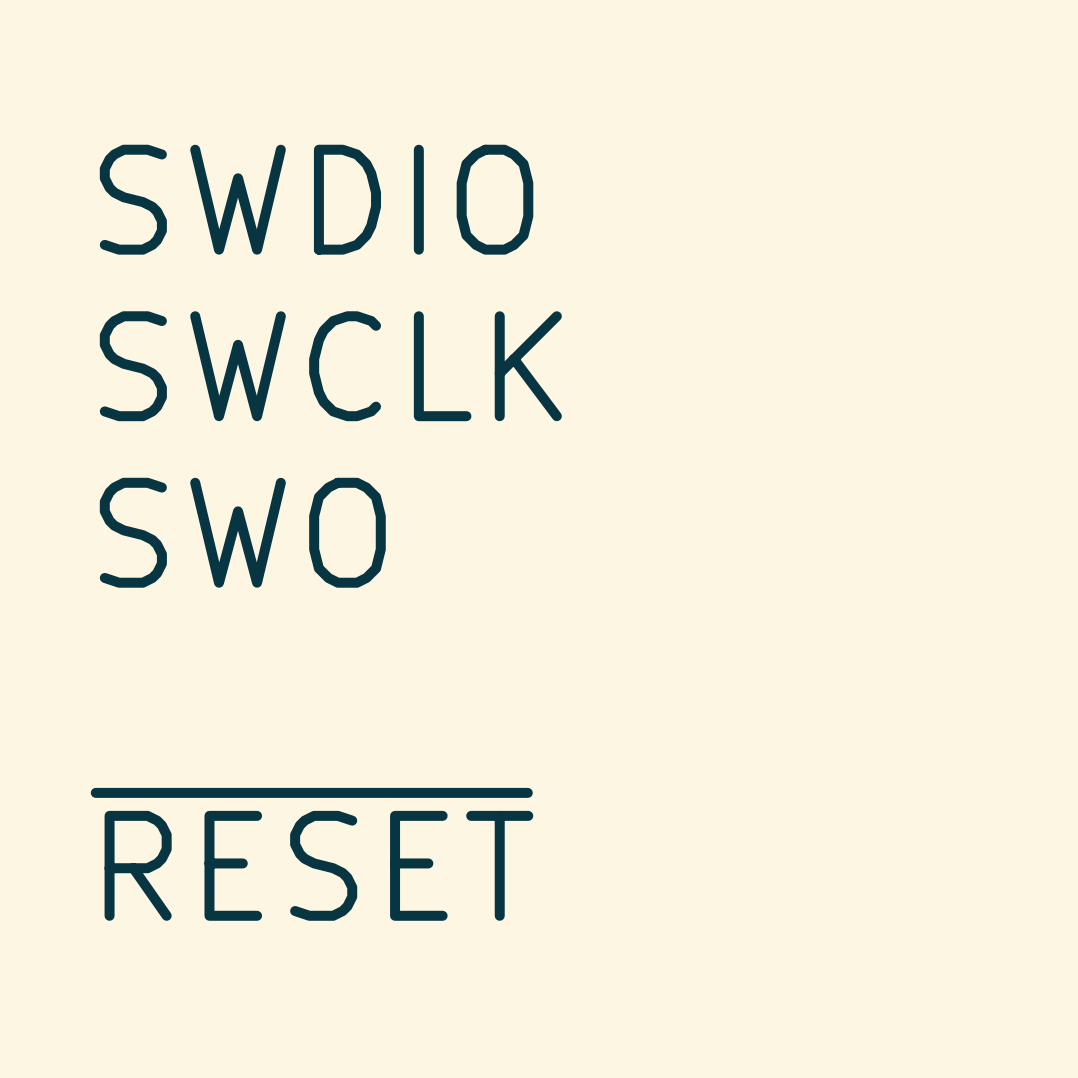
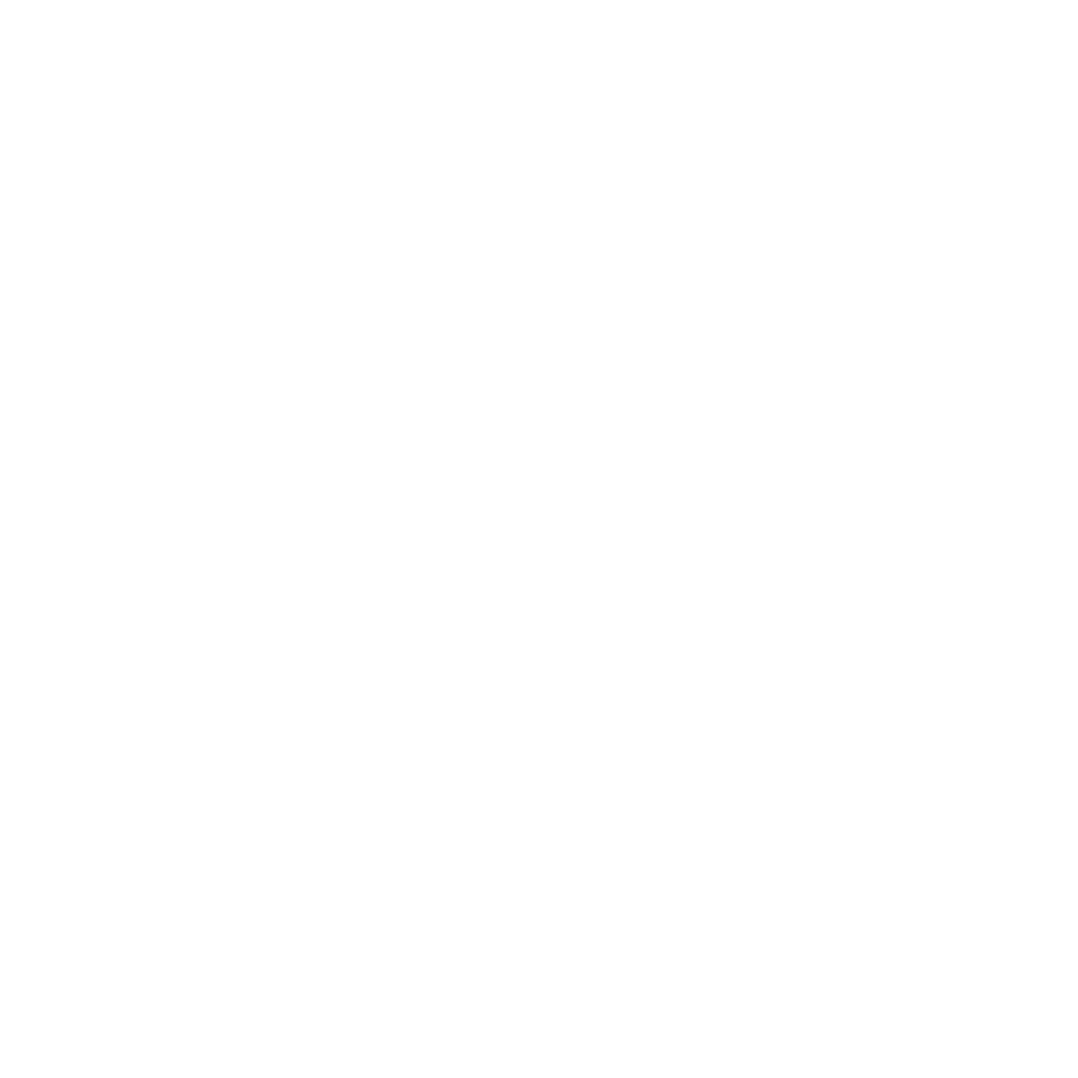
label: SWDIO (316, 199) -> none
label: SWCLK (330, 366) -> none
label: SWO (242, 532) -> none
label: ~{RESET} (312, 854) -> none

